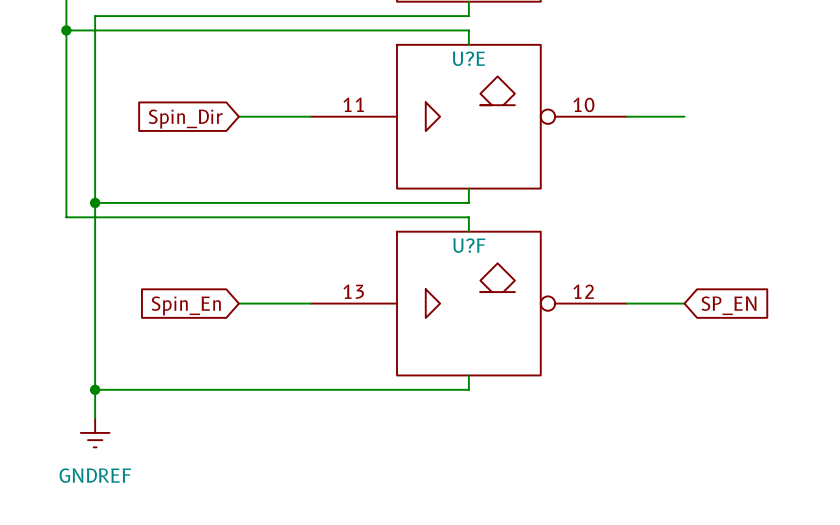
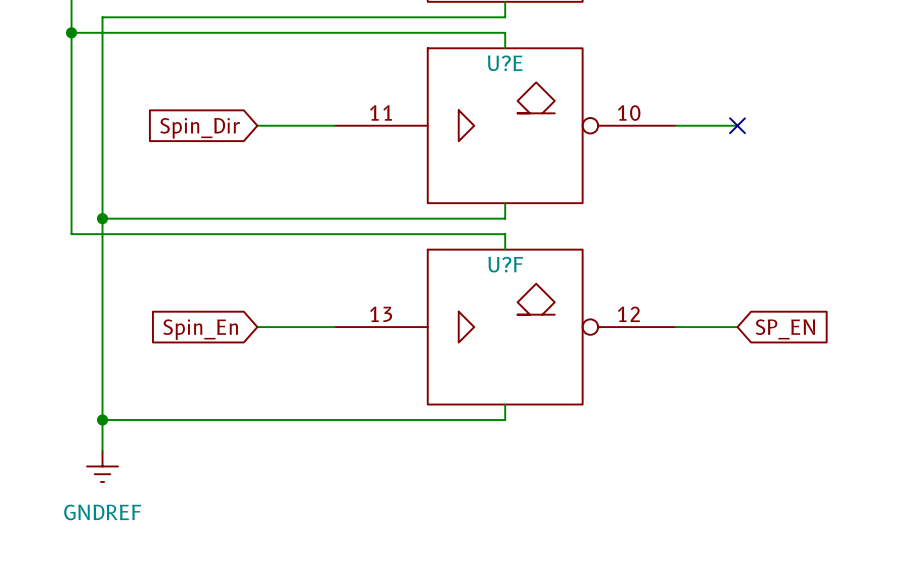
no-connect mark: none -> (737, 125)

